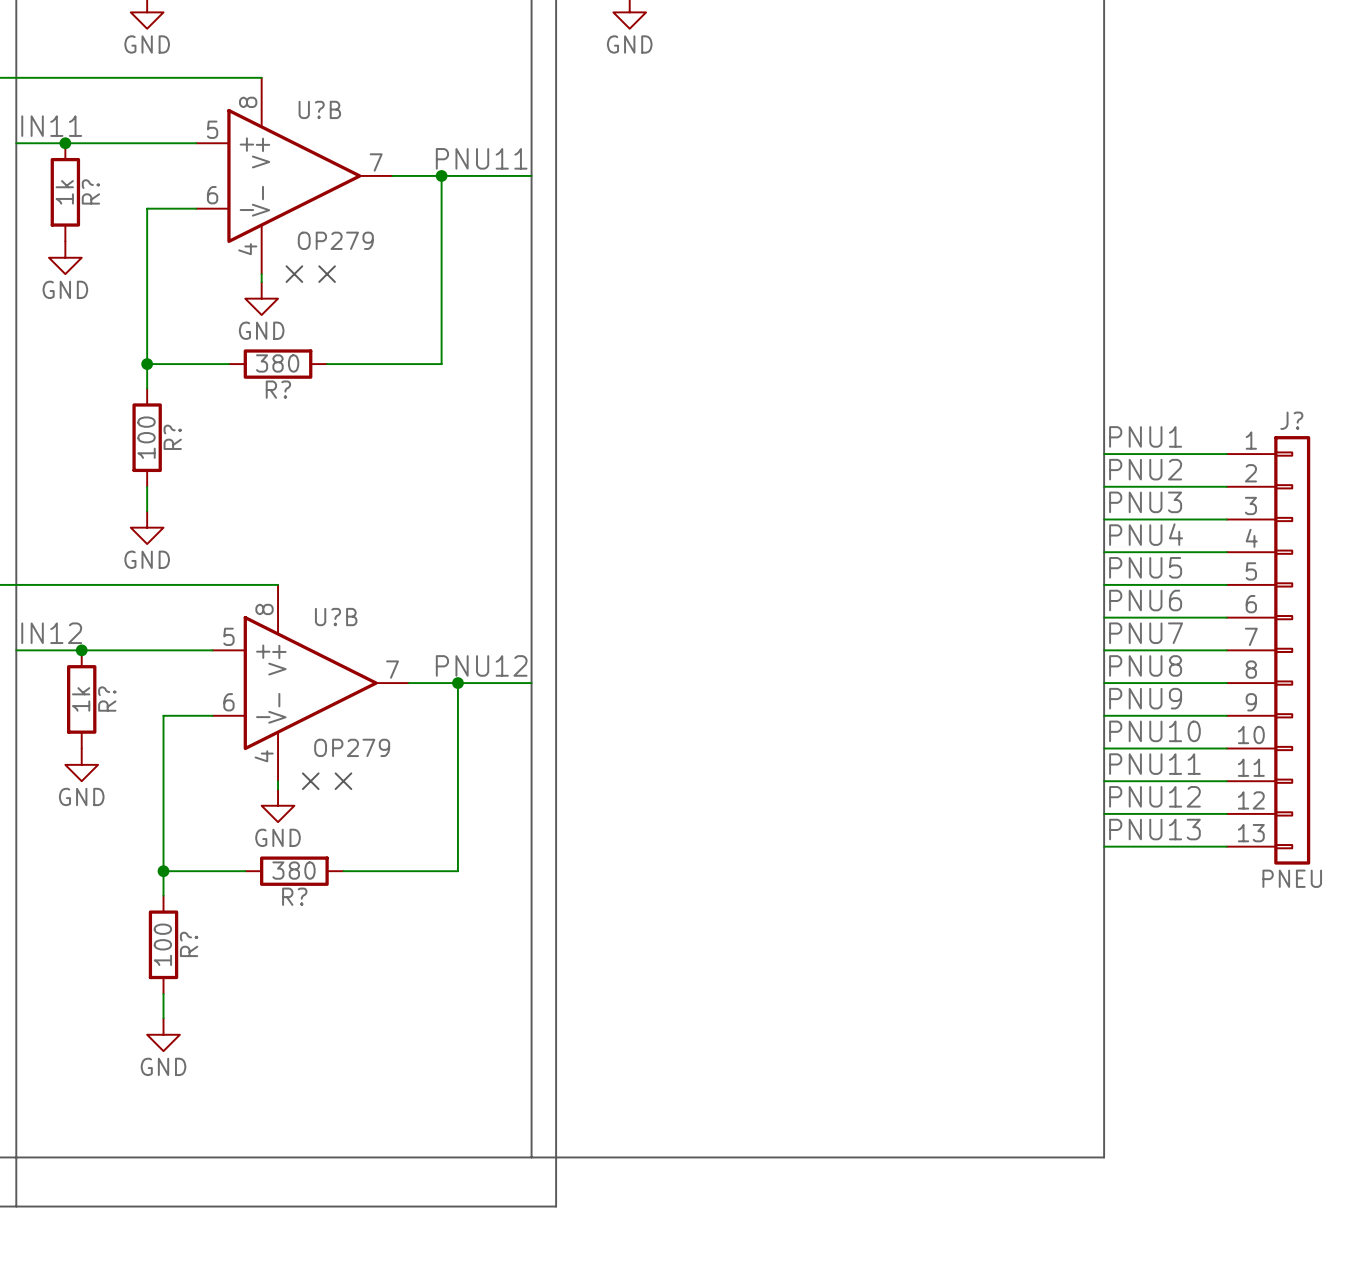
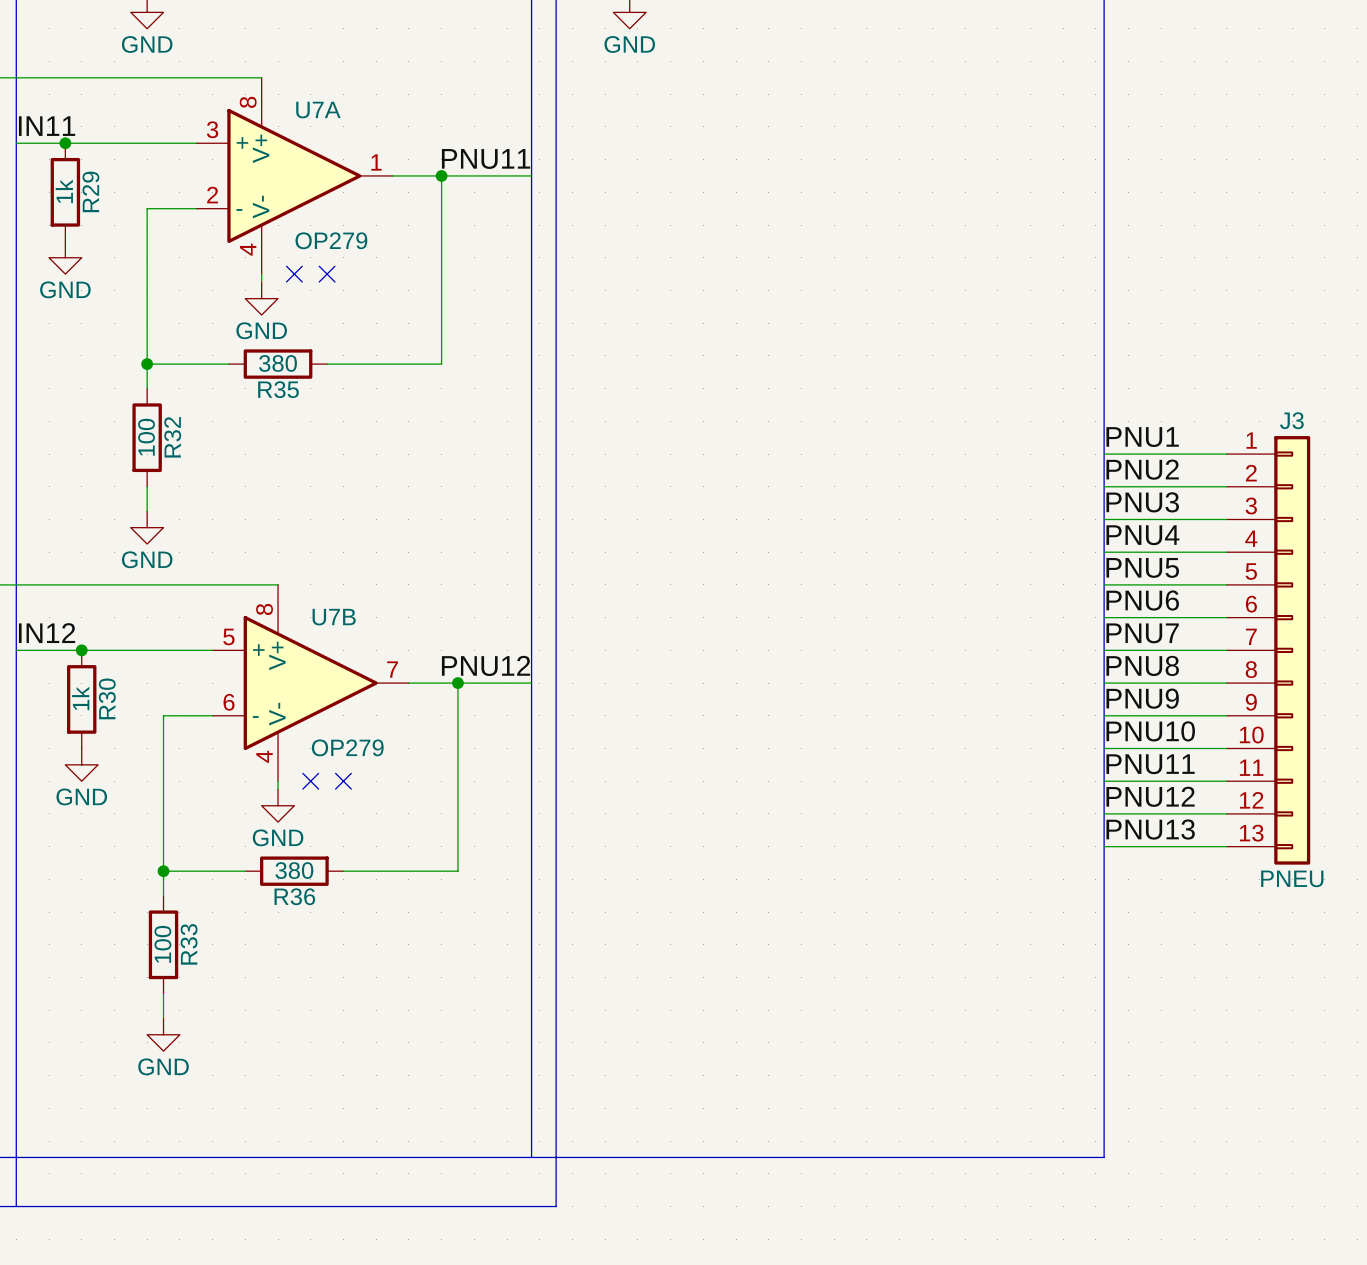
U?B name: U?B (319, 109) -> U7A (318, 110)
U?B pin number: 5 (212, 129) -> 3 (212, 129)
U?B pin number: 7 (376, 162) -> 1 (376, 162)
R? name: R? (90, 191) -> R29 (90, 191)
U?B pin number: 6 (212, 195) -> 2 (212, 195)
R? name: R? (278, 389) -> R35 (278, 389)
J? name: J? (1291, 420) -> J3 (1291, 420)
R? name: R? (172, 437) -> R32 (172, 437)
U?B name: U?B (336, 617) -> U7B (334, 617)
R? name: R? (107, 699) -> R30 (107, 698)
R? name: R? (294, 896) -> R36 (294, 896)
R? name: R? (189, 944) -> R33 (189, 944)

